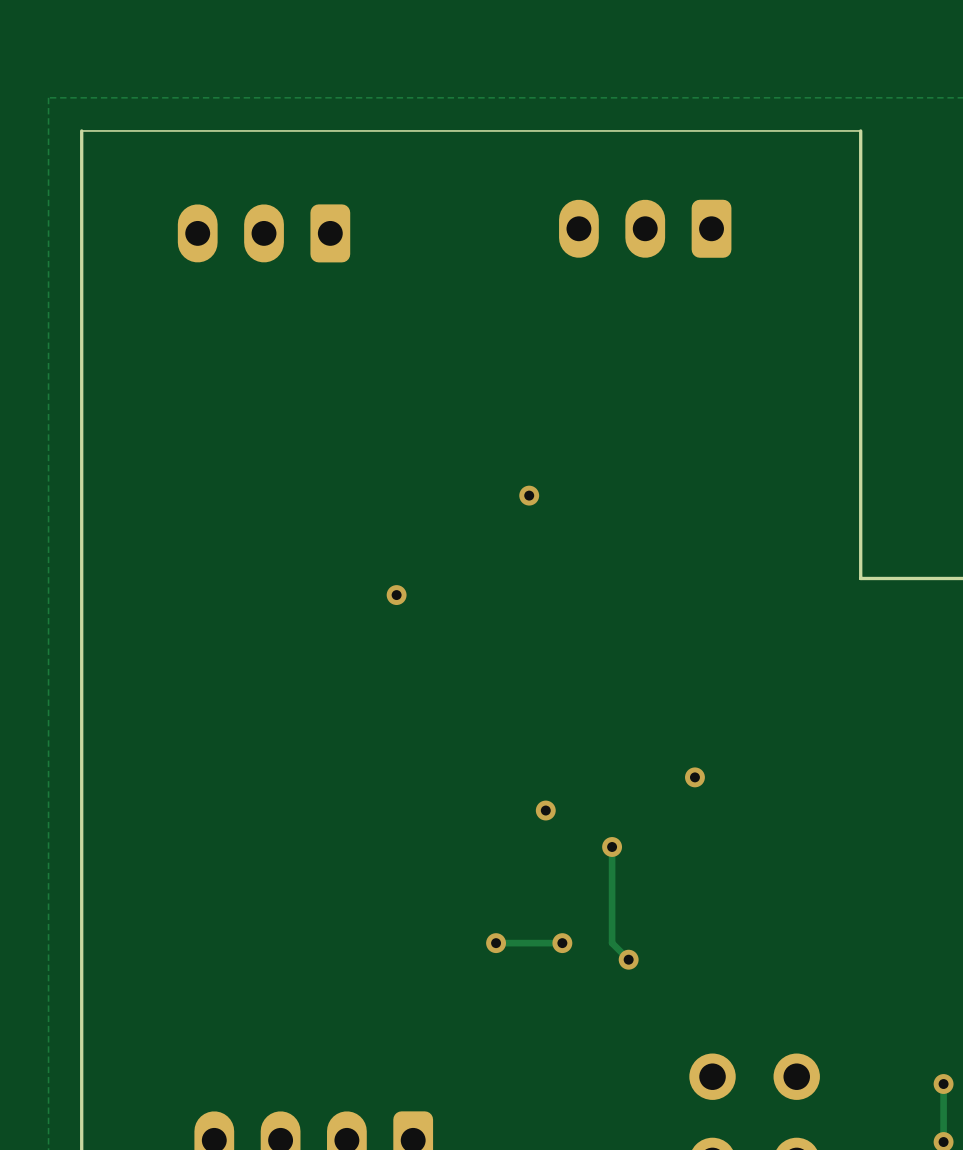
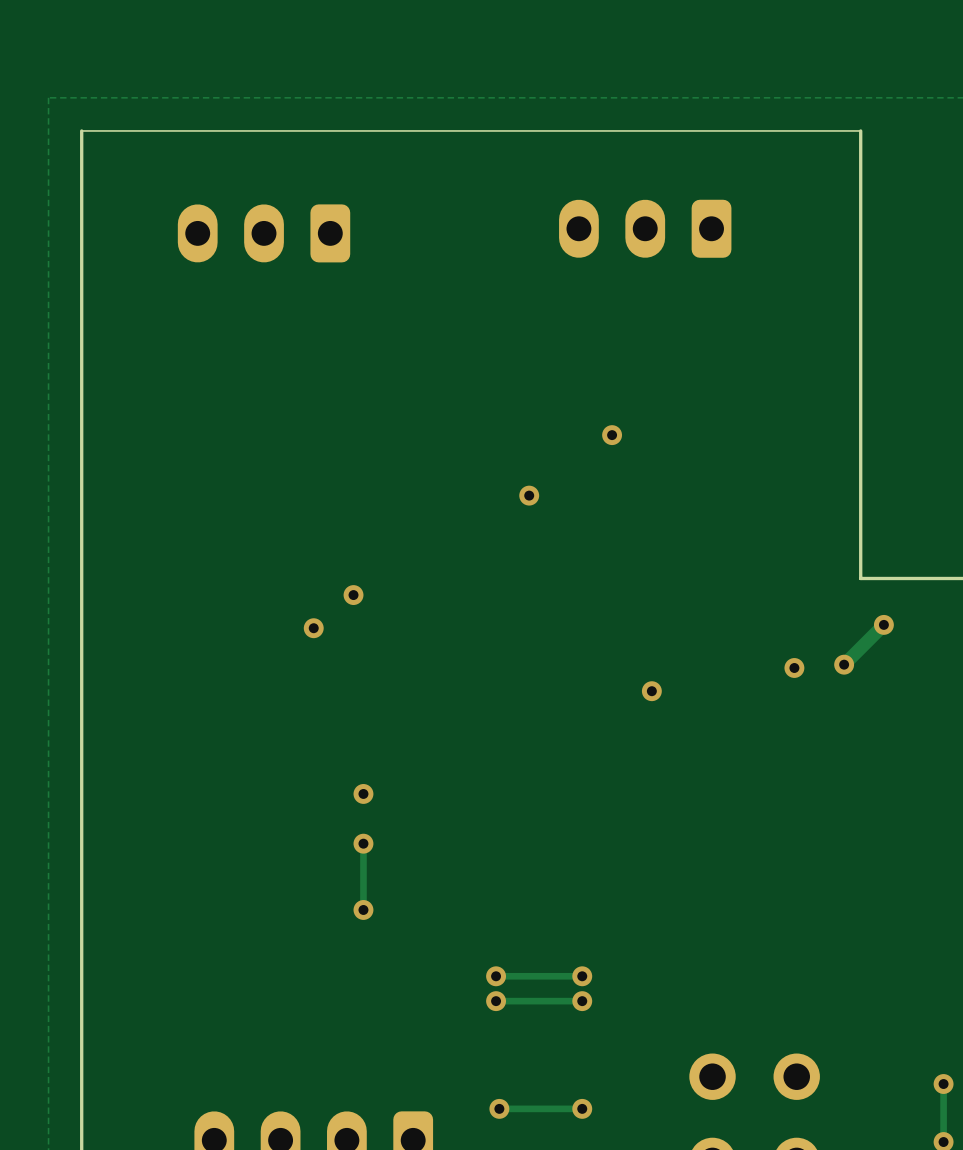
via: none -> (612, 435)
via position: (396, 595) -> (353, 595)
track: none -> (883, 624) (844, 664)
via: none -> (883, 624)
via: none -> (313, 628)
via: none -> (844, 664)
via: none -> (794, 667)
via: none -> (651, 691)
via: (694, 777) -> none
via: none -> (363, 793)
via: (545, 810) -> none
track: none -> (363, 843) (363, 909)
via: none -> (363, 843)
track: (612, 846) (612, 943) (628, 959) -> none
via: (612, 846) -> none
via: none -> (363, 909)
via: (496, 943) -> none
track: (562, 943) (496, 943) -> none
via: (562, 943) -> none
via: (628, 959) -> none
via: none -> (496, 976)
track: none -> (582, 976) (496, 976)
via: none -> (582, 976)
via: none -> (496, 1001)
track: none -> (582, 1001) (496, 1001)
via: none -> (582, 1001)
via: none -> (499, 1108)
track: none -> (582, 1108) (499, 1108)
via: none -> (582, 1108)

